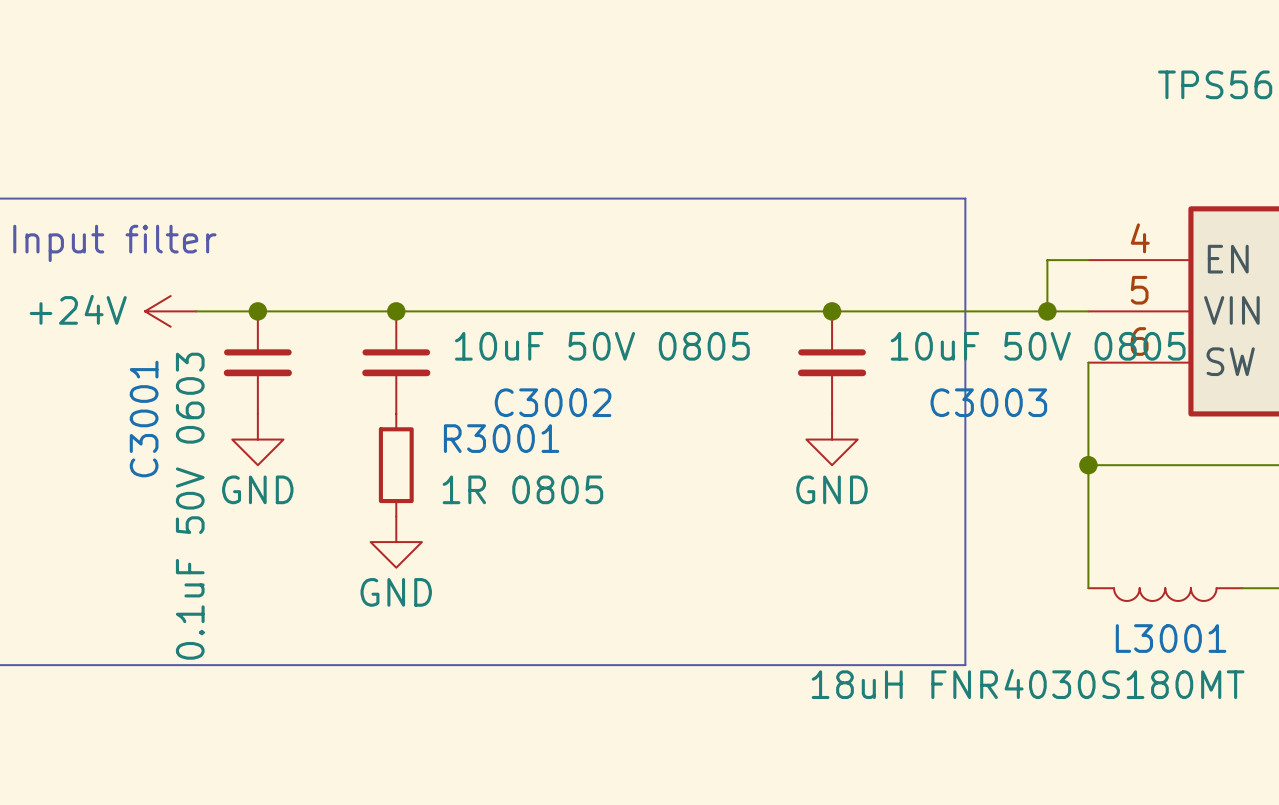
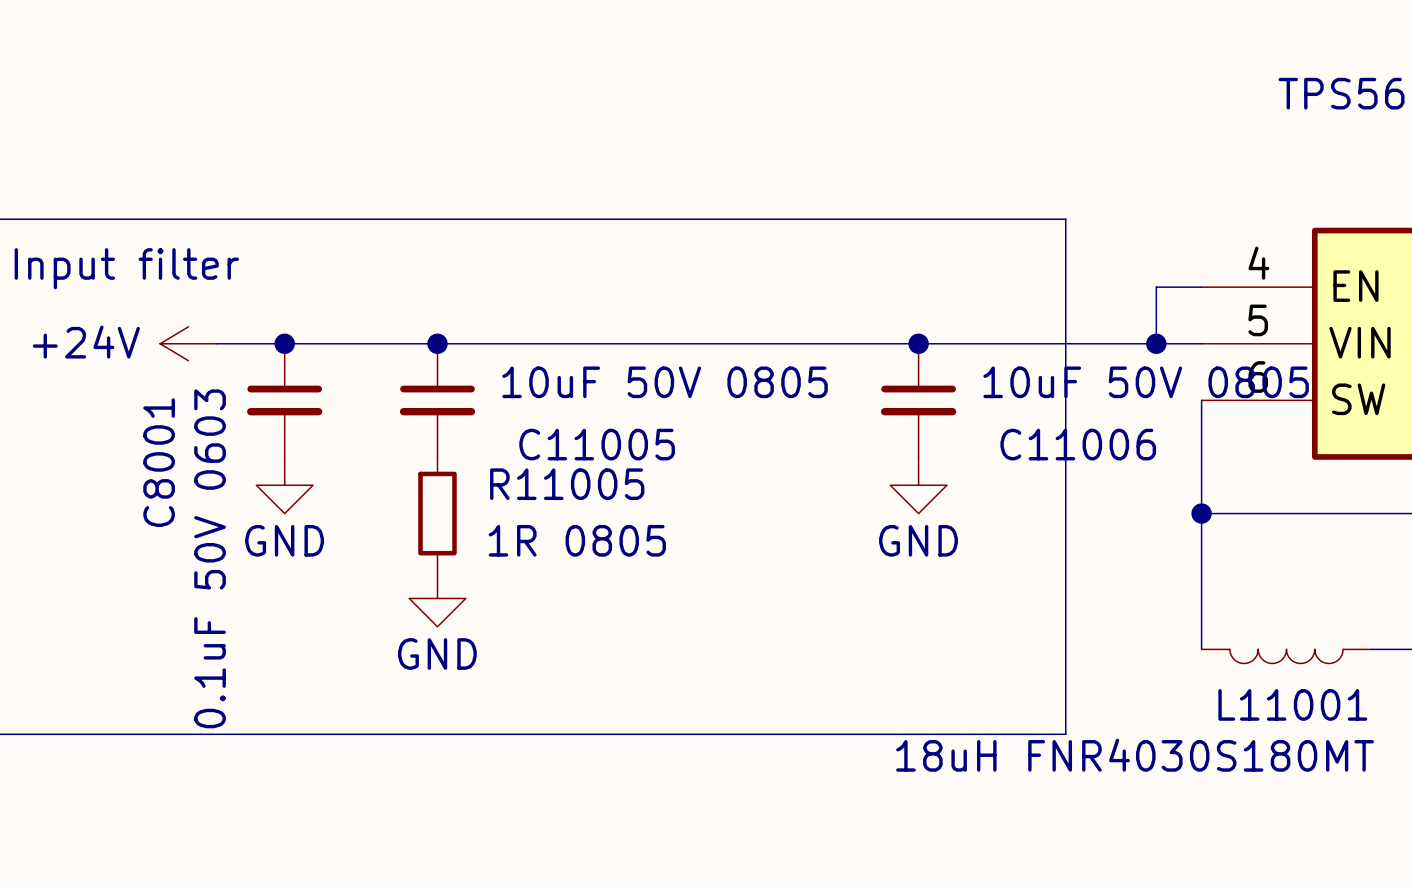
C3002 name: C3002 (553, 402) -> C11005 (597, 444)
C3003 name: C3003 (988, 402) -> C11006 (1078, 444)
C3001 name: C3001 (144, 419) -> C8001 (159, 462)
R3001 name: R3001 (501, 438) -> R11005 (567, 484)
L3001 name: L3001 (1171, 638) -> L11001 (1292, 704)

